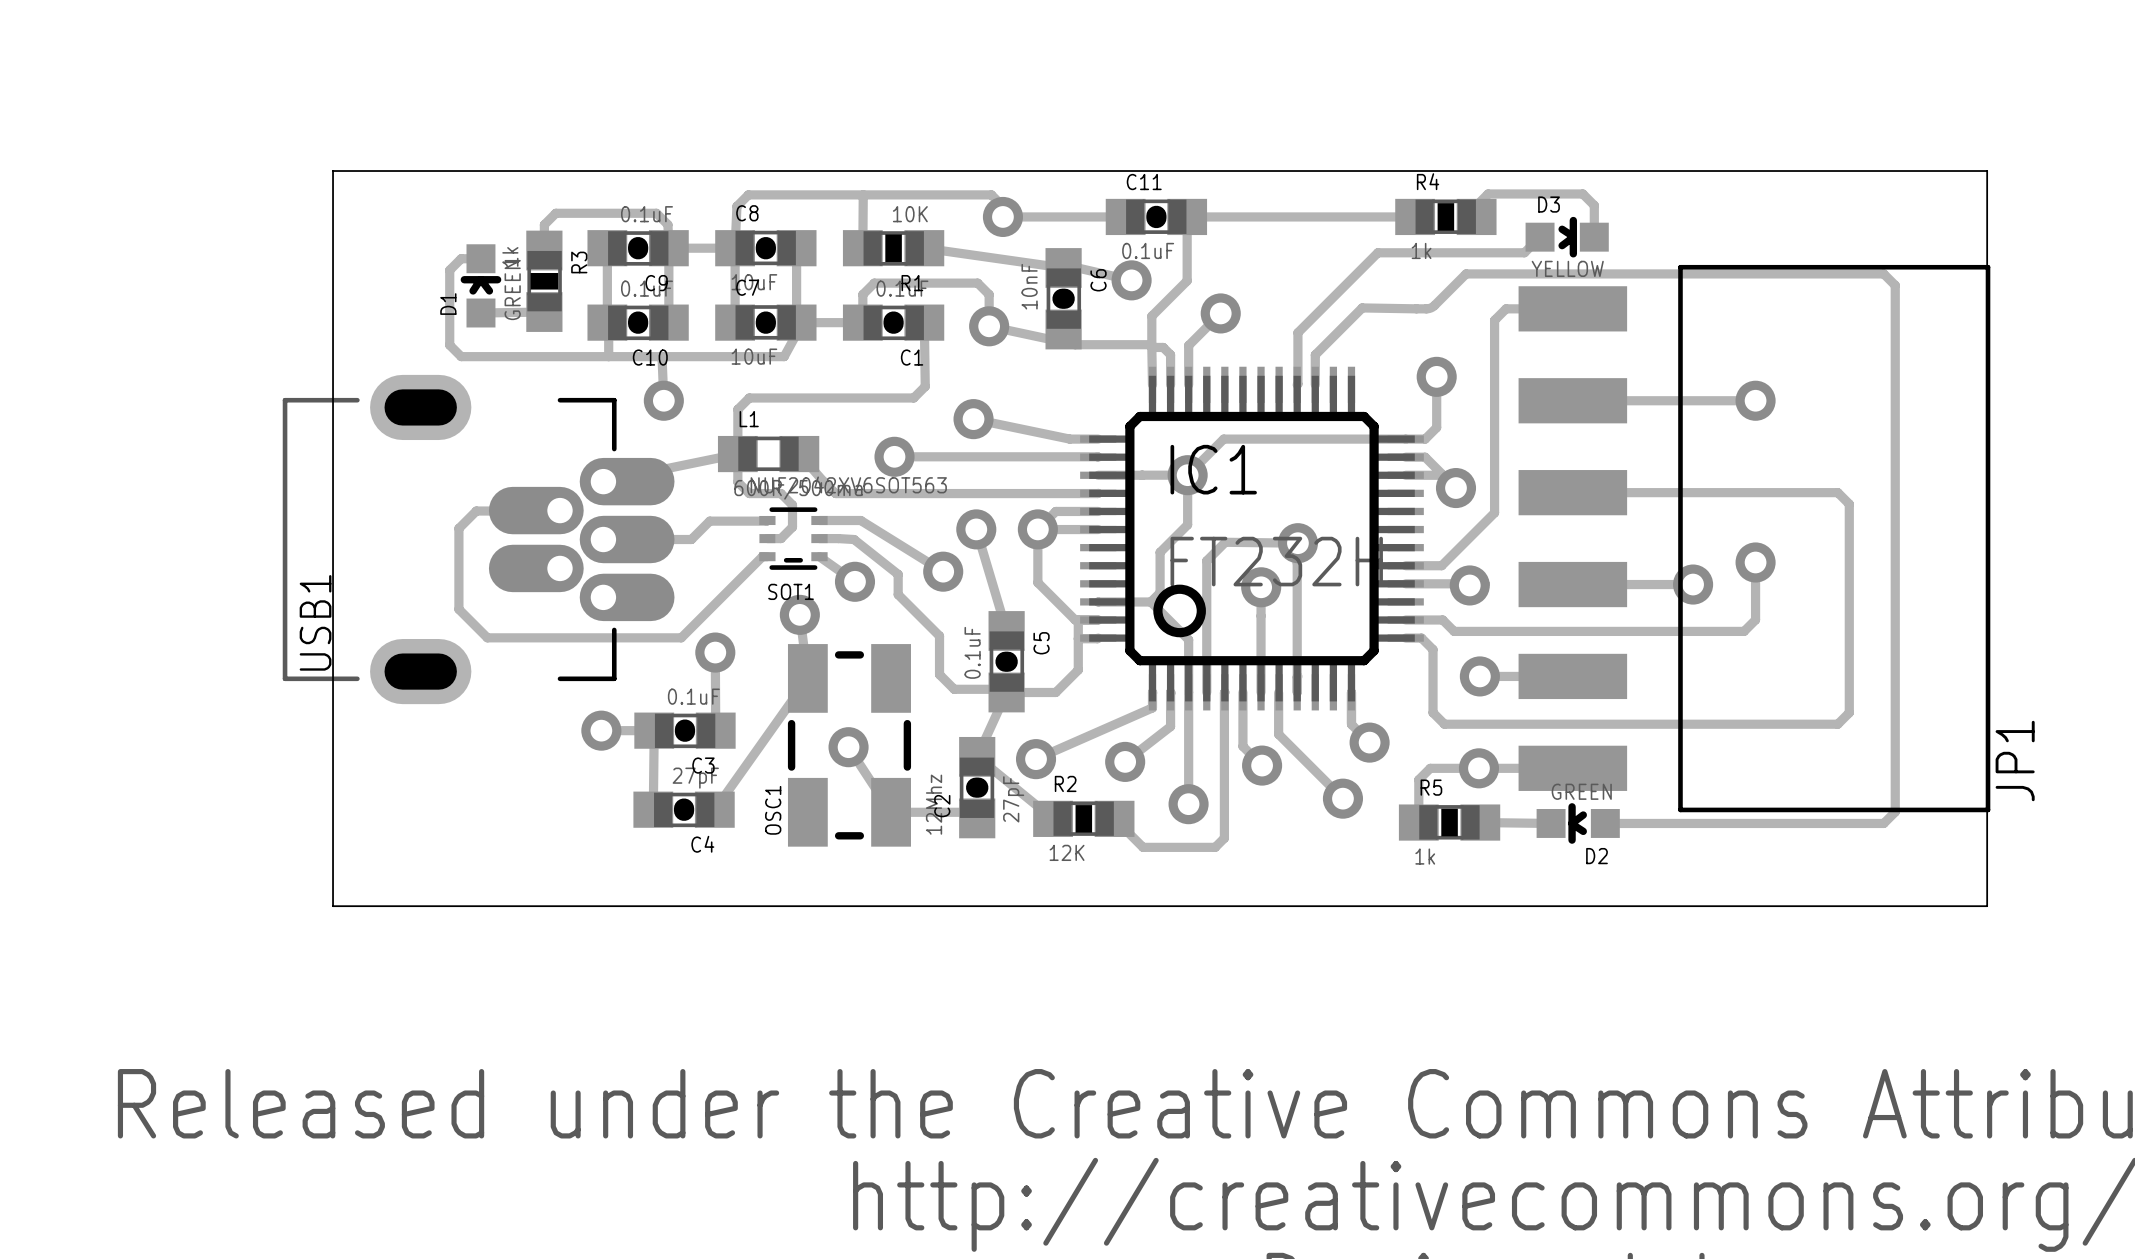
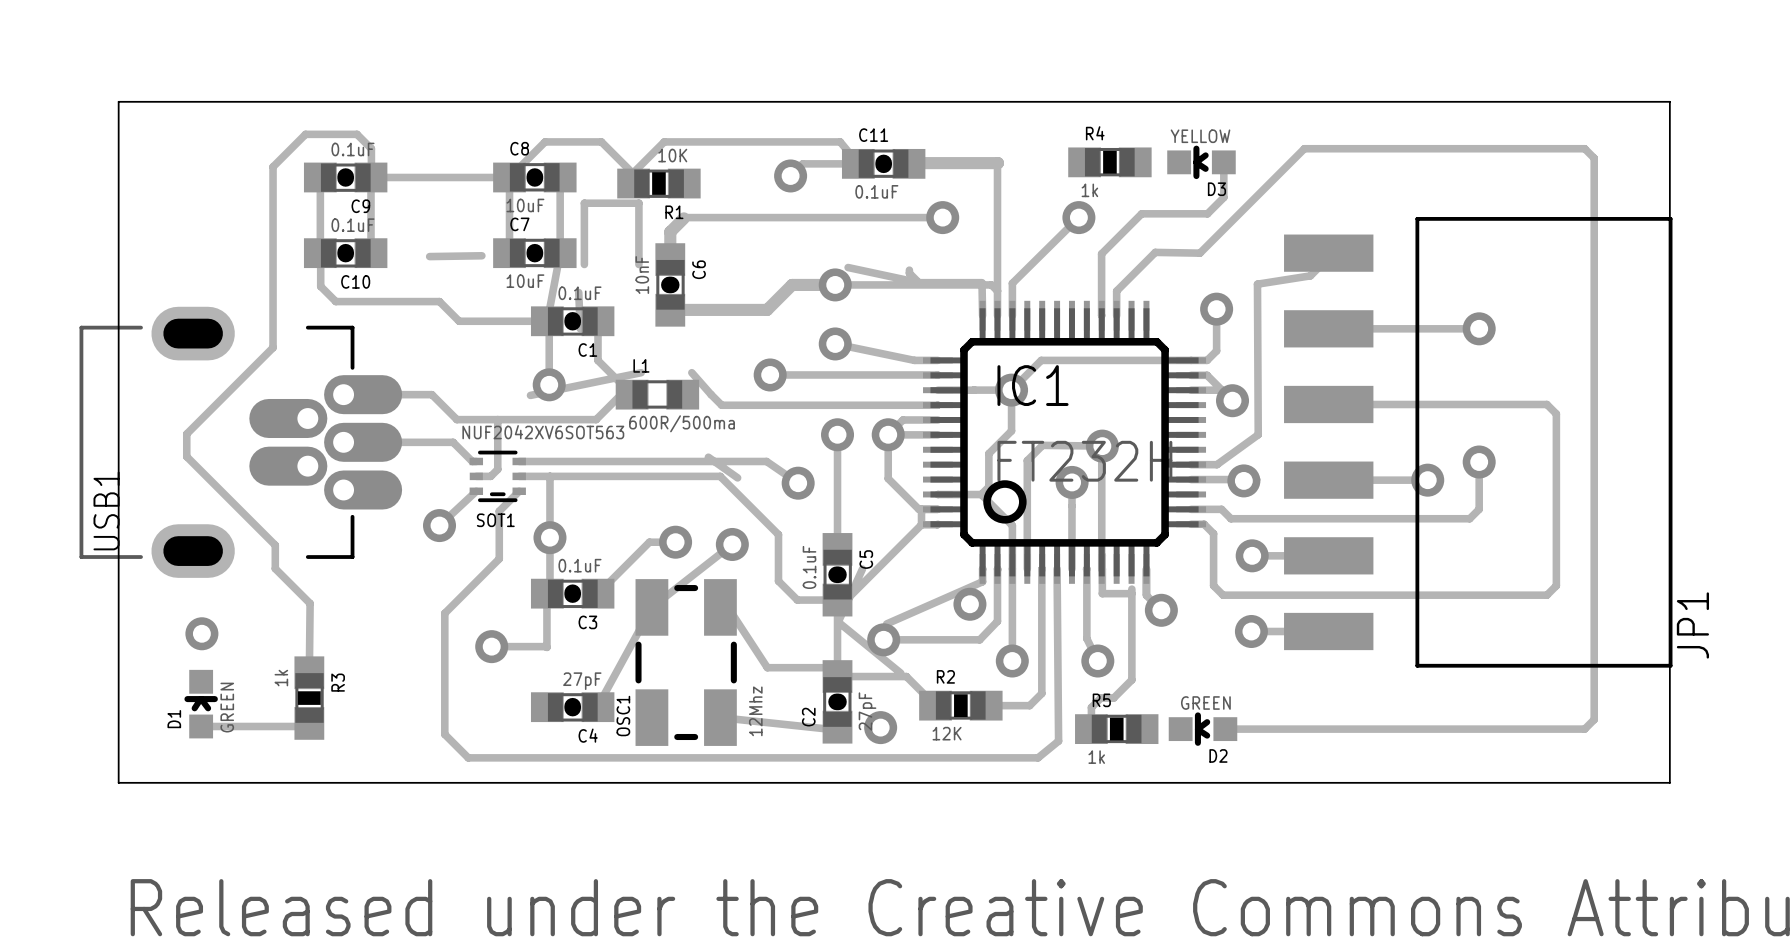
board edge: (1987, 171) (333, 171) (333, 906) (1987, 906) -> (1669, 139) (1669, 101) (118, 101) (118, 782) (1669, 782) (1669, 745)
track: (863, 194) (862, 248) -> none
track: none -> (909, 163) (997, 163) (997, 290)
track: none -> (633, 174) (601, 141) (545, 141) (509, 177)
track: none -> (790, 175) (802, 163) (858, 163) (840, 141) (664, 141) (633, 172) (633, 183)
via: none -> (790, 175)
track: none -> (320, 177) (320, 253) (307, 253) (320, 266) (320, 286) (335, 301) (439, 301) (459, 321) (547, 321)
track: none -> (371, 177) (371, 148) (357, 134) (305, 134) (273, 166) (273, 347) (186, 434) (186, 456) (275, 545) (275, 568) (310, 603) (309, 672)
track: none -> (509, 177) (509, 253)
track: none -> (509, 177) (370, 177) (370, 253)
track: none -> (560, 177) (560, 253) (547, 321)
via: (1002, 216) -> none
track: (1125, 216) (1002, 216) (1002, 206) (991, 194) (748, 194) (736, 206) (735, 248) -> none
C11 position: (1156, 216) -> (883, 163)
track: (1415, 216) (1187, 216) (1187, 280) (1151, 316) (1151, 347) -> (670, 309) (767, 309) (792, 284) (982, 284)
R4 position: (1445, 216) -> (1109, 162)
track: (1476, 216) (1476, 205) (1488, 193) (1582, 193) (1594, 205) (1594, 237) -> none
track: (1540, 237) (1524, 252) (1377, 252) (1297, 332) (1297, 384) -> (1223, 162) (1223, 197) (1207, 213) (1141, 213) (1101, 253) (1101, 315)
D3 rotation: 0° (1567, 237) -> 180° (1201, 162)
D3 position: (1567, 237) -> (1201, 162)
track: (607, 248) (608, 356) -> none
C9 position: (638, 248) -> (345, 177)
track: (668, 248) (667, 224) (656, 213) (555, 213) (544, 224) (544, 250) -> none
C8 position: (765, 248) -> (534, 177)
track: (796, 248) (796, 322) -> none
R1 position: (893, 248) -> (658, 183)
track: (924, 248) (1063, 267) (1067, 265) (1131, 280) -> none
track: (480, 258) (461, 258) (449, 270) (449, 345) (461, 356) (784, 356) (797, 332) (796, 322) -> none
track: none -> (942, 217) (684, 217) (670, 231) (670, 259)
via: none -> (1078, 217)
via position: (1131, 280) -> (942, 217)
R3 position: (544, 281) -> (309, 698)
D1 position: (480, 285) -> (201, 704)
track: (1895, 285) (1883, 273) (1466, 273) (1433, 306) (1416, 308) -> (1594, 233) (1594, 158) (1584, 148) (1304, 148) (1199, 253)
C6 position: (1063, 298) -> (670, 284)
track: (1572, 308) (1506, 308) (1494, 320) (1494, 512) (1441, 565) (1437, 565) -> (1328, 253) (1334, 251) (1310, 275) (1257, 284) (1258, 434) (1216, 464)
track: (1220, 313) (1188, 345) -> (1078, 217) (1012, 283)
via: (1220, 313) -> none
C10 position: (638, 322) -> (345, 253)
C7 position: (765, 322) -> (534, 253)
track: (796, 322) (862, 322) (862, 294) (874, 283) (977, 283) (989, 294) (989, 334) -> none
C1 position: (893, 322) -> (572, 321)
track: (924, 322) (925, 386) (913, 397) (749, 397) (737, 409) (737, 482) (749, 493) (781, 493) (792, 505) (792, 527) (781, 538) (767, 538) -> none
via position: (989, 326) -> (835, 284)
track: none -> (547, 321) (549, 323) (549, 384)
track: none -> (598, 321) (598, 360) (632, 394) (621, 394) (596, 419) (494, 419)
via position: (663, 400) -> (549, 384)
L1 position: (768, 454) -> (657, 394)
track: (514, 511) (476, 511) (458, 528) (458, 609) (487, 637) (681, 637) (762, 556) (767, 556) -> (456, 419) (431, 394) (343, 394)
track: none -> (497, 419) (497, 469) (490, 476) (476, 476)
track: (767, 520) (709, 521) (691, 539) (603, 539) -> none
track: (819, 520) (860, 520) (943, 571) -> none
track: (976, 529) (1006, 630) -> (837, 434) (837, 549)
track: none -> (343, 442) (453, 442) (472, 461) (476, 461)
SOT1 position: (793, 538) -> (497, 476)
track: (819, 538) (854, 539) (898, 574) (898, 594) (939, 636) (939, 674) (954, 689) (1003, 689) (1006, 692) (1055, 692) (1078, 670) (1078, 638) -> (519, 476) (720, 476) (778, 534) (778, 581) (797, 600) (846, 600) (921, 524)
USB1 position: (478, 539) -> (240, 442)
track: none -> (519, 461) (766, 461) (798, 483)
via position: (943, 571) -> (798, 483)
track: none -> (549, 476) (549, 591) (546, 594) (546, 647) (491, 646)
via: (854, 581) -> none
track: none -> (476, 491) (439, 525)
track: (799, 614) (807, 678) (714, 809) -> none
via: (799, 614) -> none
via: none -> (439, 525)
track: (715, 652) (715, 730) -> none
via: (715, 652) -> none
via: none -> (549, 537)
track: none -> (675, 542) (649, 542) (598, 593)
via: none -> (675, 542)
C5 position: (1006, 661) -> (837, 574)
track: none -> (732, 544) (651, 607) (598, 707)
via: none -> (732, 544)
track: (1242, 692) (1242, 746) (1262, 765) -> (1057, 568) (1058, 741) (1038, 757) (468, 757) (444, 734) (444, 613) (499, 558) (499, 511) (519, 491)
track: (1278, 692) (1278, 734) (1342, 798) -> (1086, 568) (1086, 638) (1097, 661) (1108, 661)
track: none -> (1102, 568) (1102, 593) (1131, 593)
track: none -> (1131, 589) (1131, 679) (1113, 698) (1100, 698) (1091, 707) (1091, 729)
track: (1170, 726) (1125, 761) -> (997, 597) (997, 621) (979, 639) (883, 639)
track: (601, 730) (654, 730) (653, 809) -> none
via: (601, 730) -> none
C3 position: (684, 730) -> (572, 593)
track: none -> (837, 600) (837, 676) (906, 676) (935, 705)
OSC1 position: (849, 745) -> (686, 662)
via: (848, 747) -> none
via position: (1036, 759) -> (883, 639)
via position: (1125, 761) -> (969, 604)
via: (1262, 765) -> none
track: (1478, 768) (1430, 768) (1418, 779) (1418, 822) -> none
via: none -> (201, 633)
via: none -> (491, 646)
C2 position: (977, 787) -> (837, 701)
via: (1342, 798) -> none
via: none -> (1097, 661)
C4 position: (684, 809) -> (572, 707)
track: (1895, 811) (1883, 823) (1605, 823) -> (1594, 667) (1594, 719) (1584, 729) (1225, 729)
R2 position: (1083, 818) -> (960, 705)
track: (1114, 818) (1143, 847) (1215, 847) (1224, 838) -> (986, 705) (1029, 705) (1041, 693) (1041, 689)
R5 position: (1449, 822) -> (1116, 729)
track: (1480, 822) (1551, 823) -> none
D2 position: (1578, 823) -> (1203, 729)
track: none -> (720, 717) (841, 730) (837, 727)
track: none -> (309, 723) (306, 726) (201, 726)
via: none -> (880, 727)

